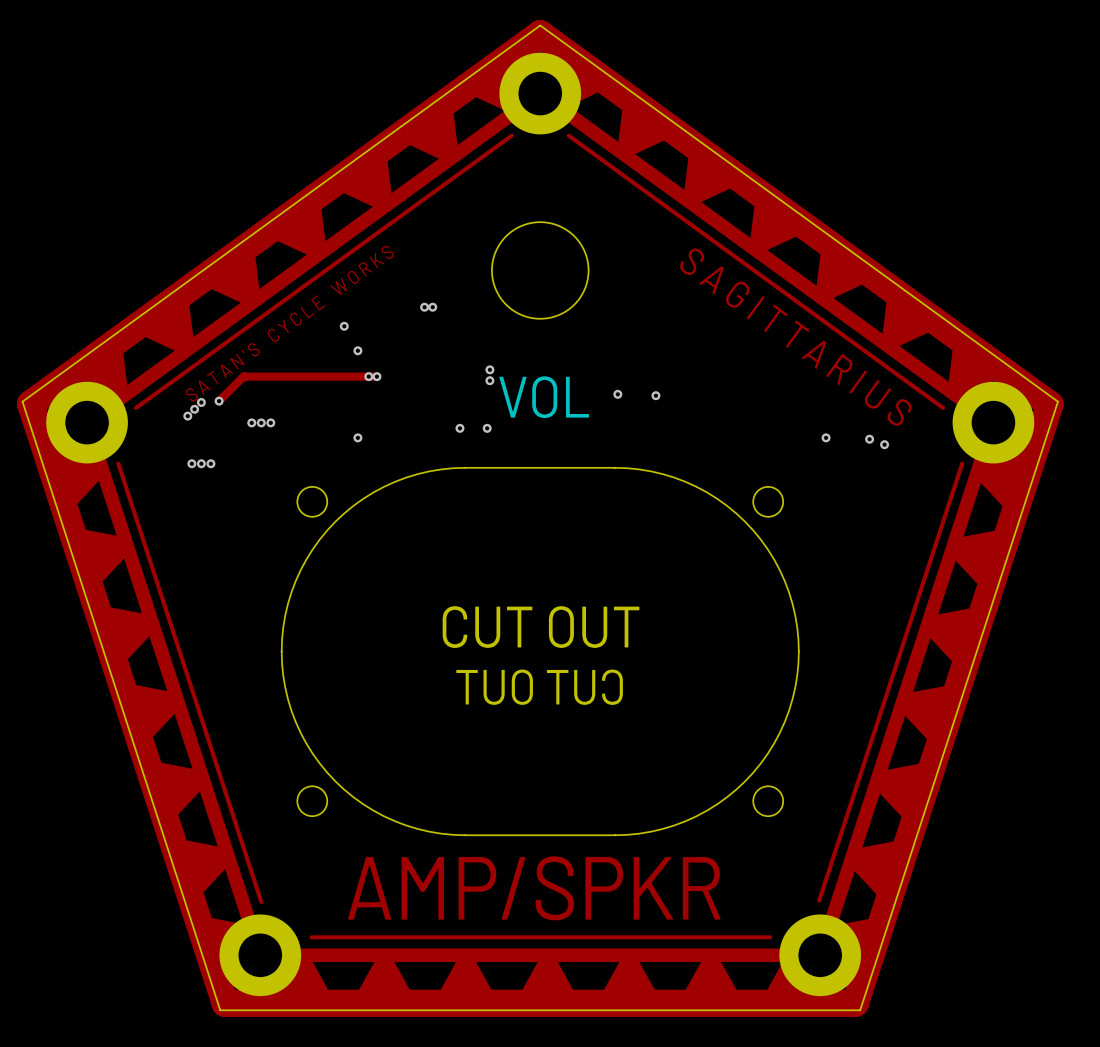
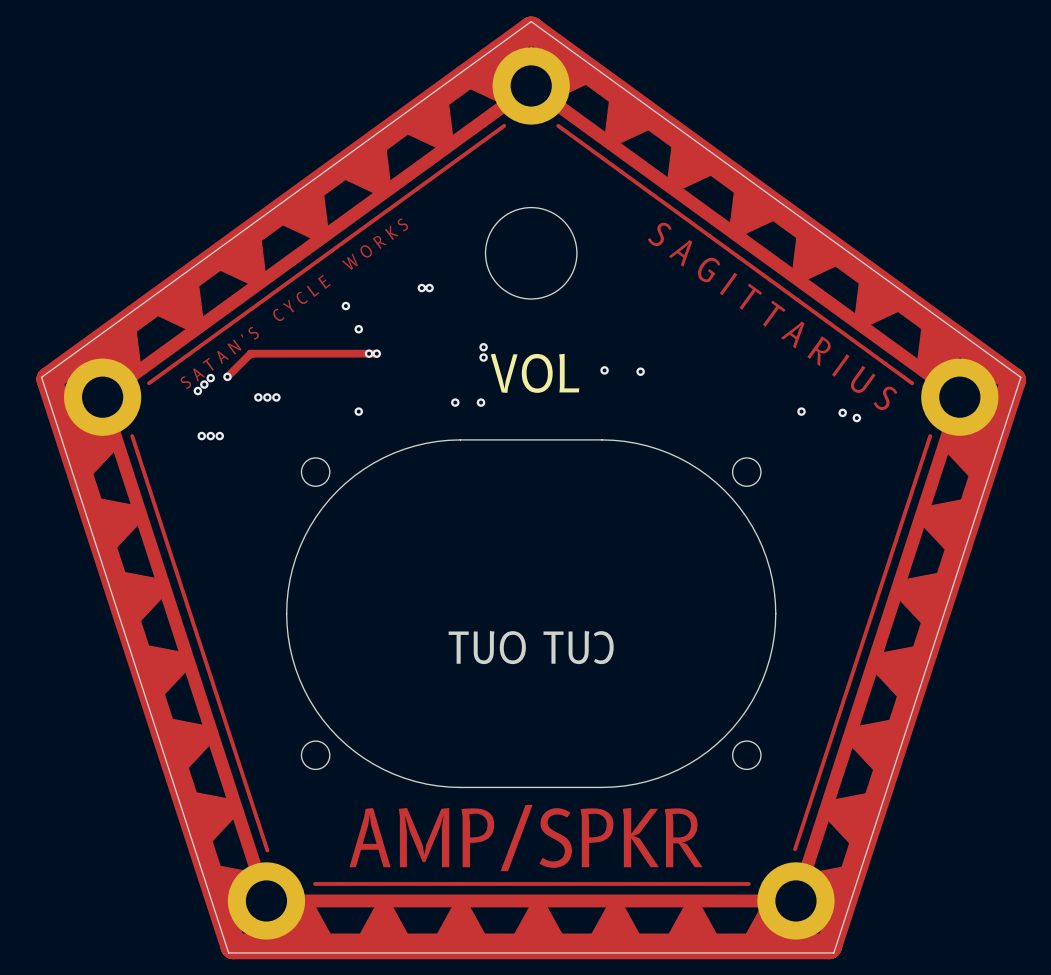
text: CUT OUT (541, 627) -> none

